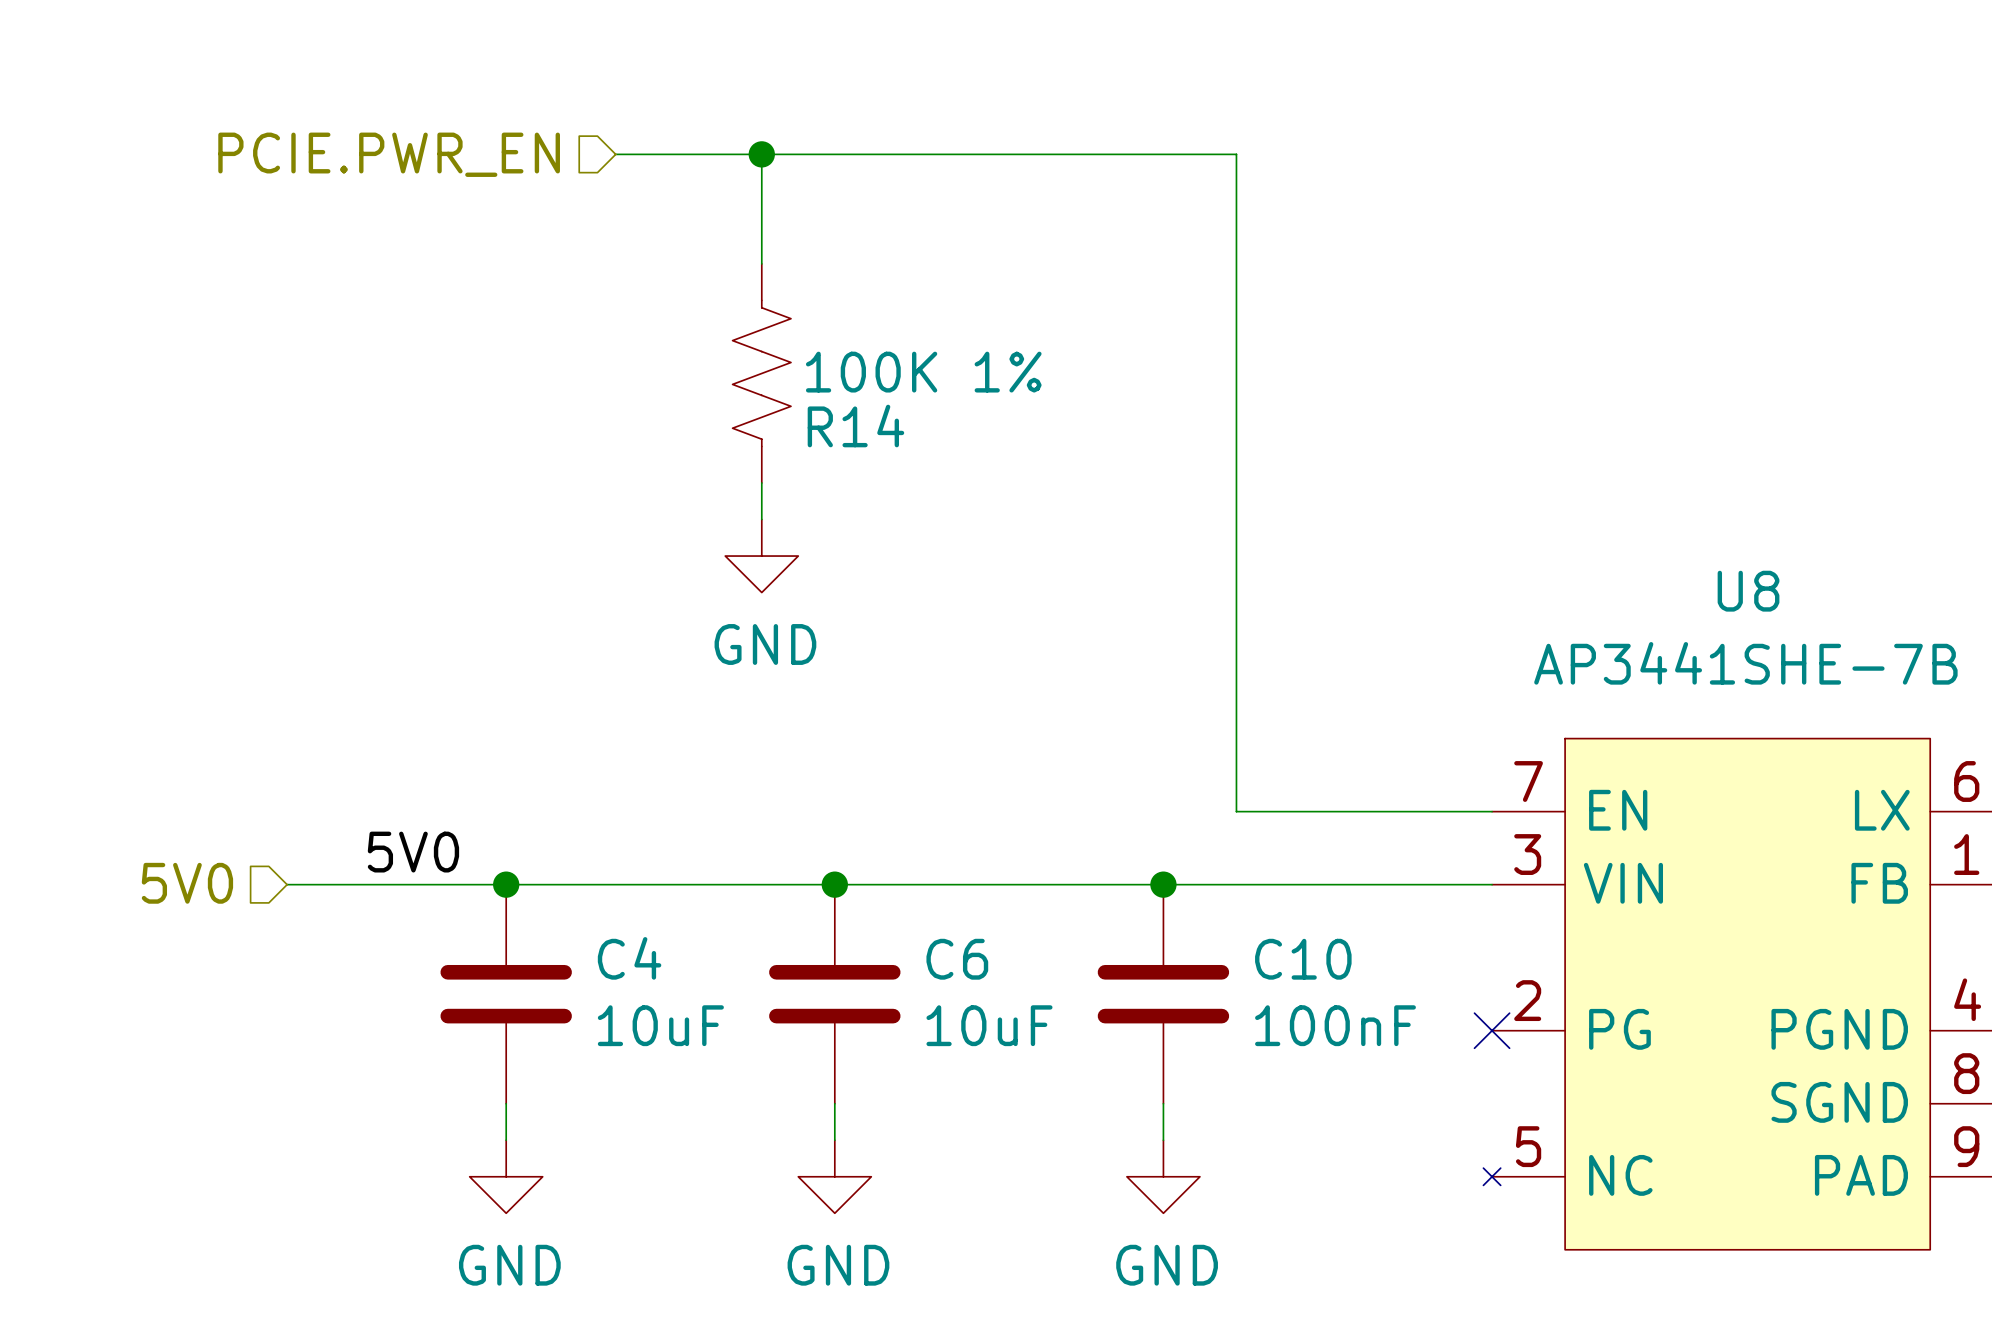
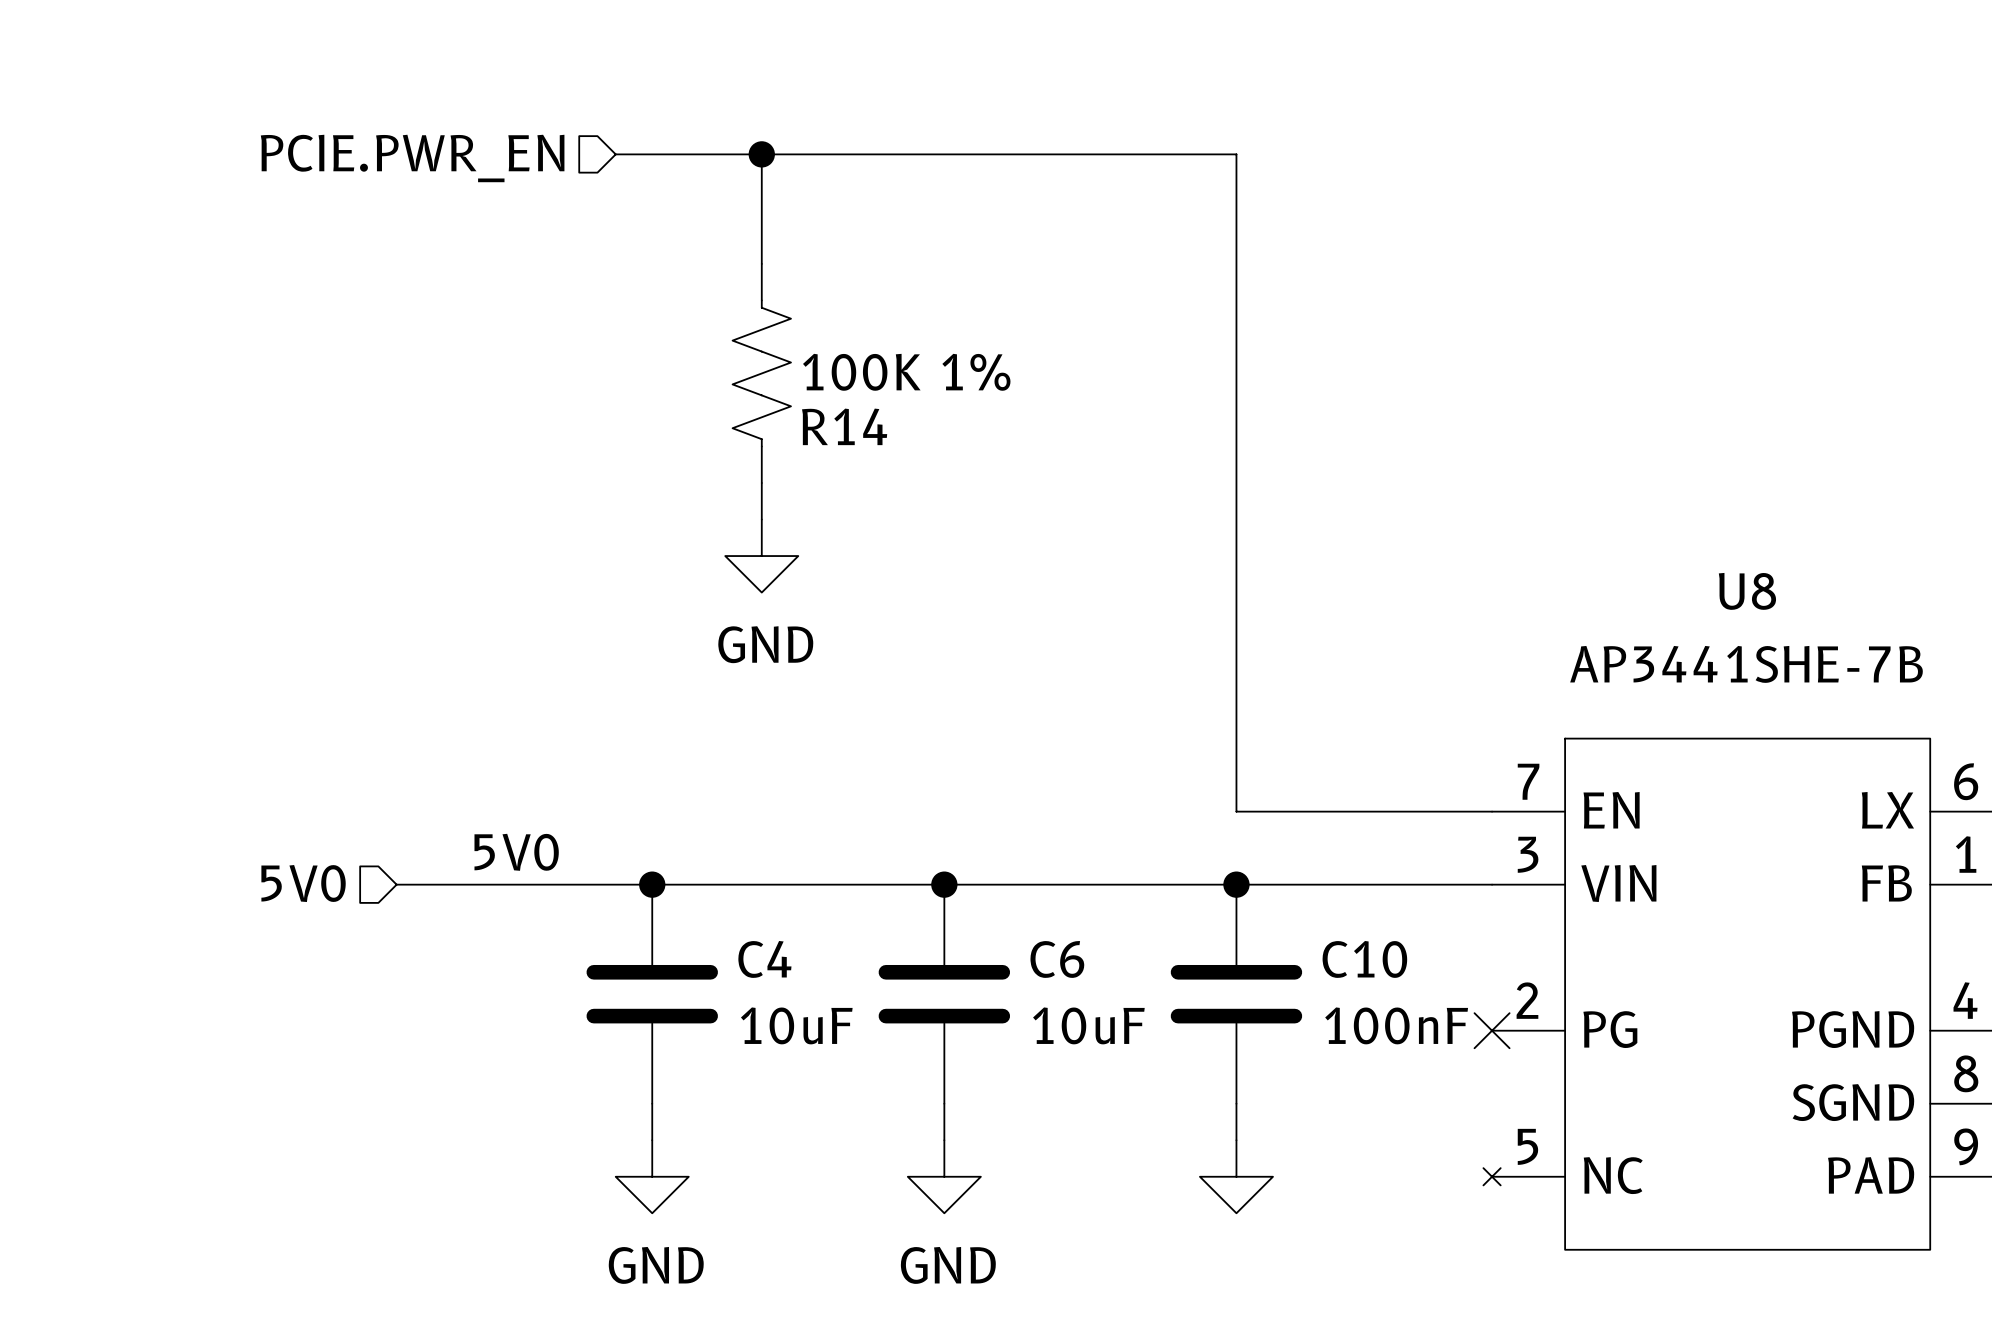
label position: 5V0 (413, 852) -> 5V0 (516, 852)
hierarchical label position: 5V0 (187, 883) -> 5V0 (303, 883)
wire: (287, 884) (396, 884) -> none
junction: (506, 884) -> none
junction: none -> (652, 884)
junction: (834, 884) -> none
junction: none -> (944, 884)
junction position: (1163, 884) -> (1236, 884)
C4 position: (506, 994) -> (652, 994)
C6 position: (834, 994) -> (944, 994)
C10 position: (1163, 994) -> (1236, 994)
wire: (506, 1103) (506, 1140) -> (652, 1103) (652, 1140)
wire: (834, 1103) (834, 1140) -> (944, 1103) (944, 1140)
wire: (1163, 1103) (1163, 1140) -> (1236, 1103) (1236, 1140)
power symbol: GND (506, 1176) -> none
power symbol: none -> GND (652, 1176)
power symbol: GND (834, 1176) -> none
power symbol: none -> GND (944, 1176)
power symbol: GND (1163, 1176) -> none
power symbol: none -> (1236, 1176)

